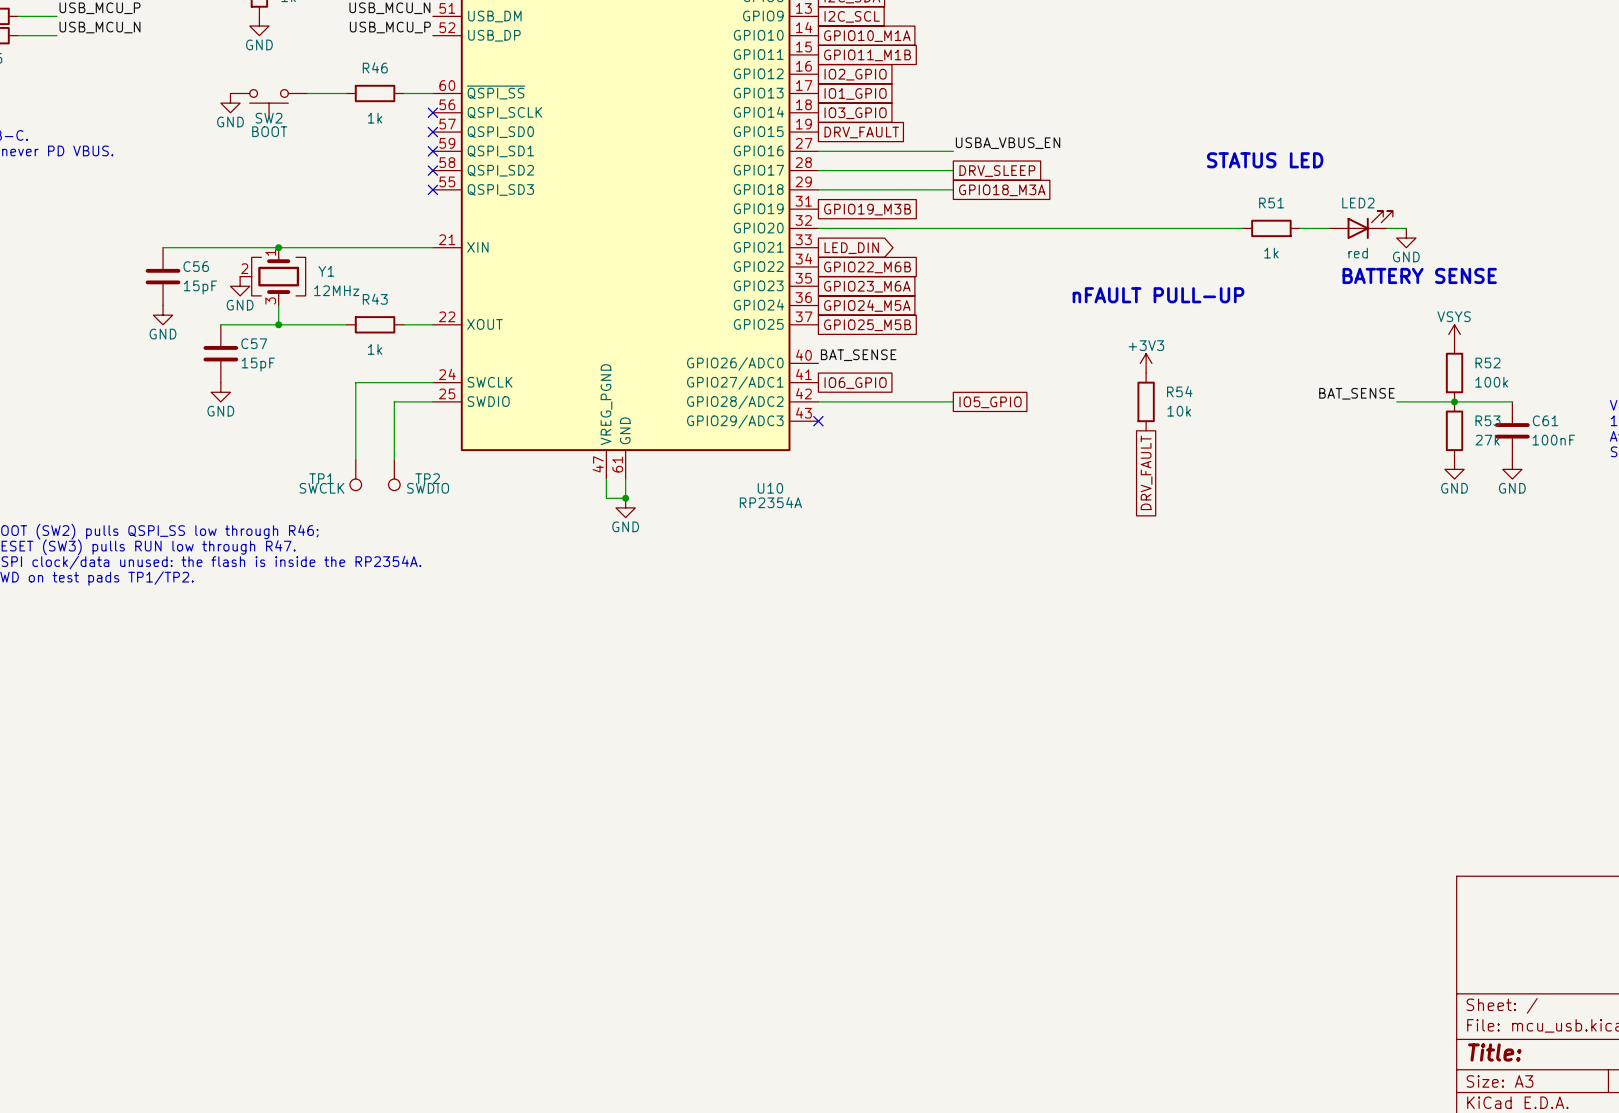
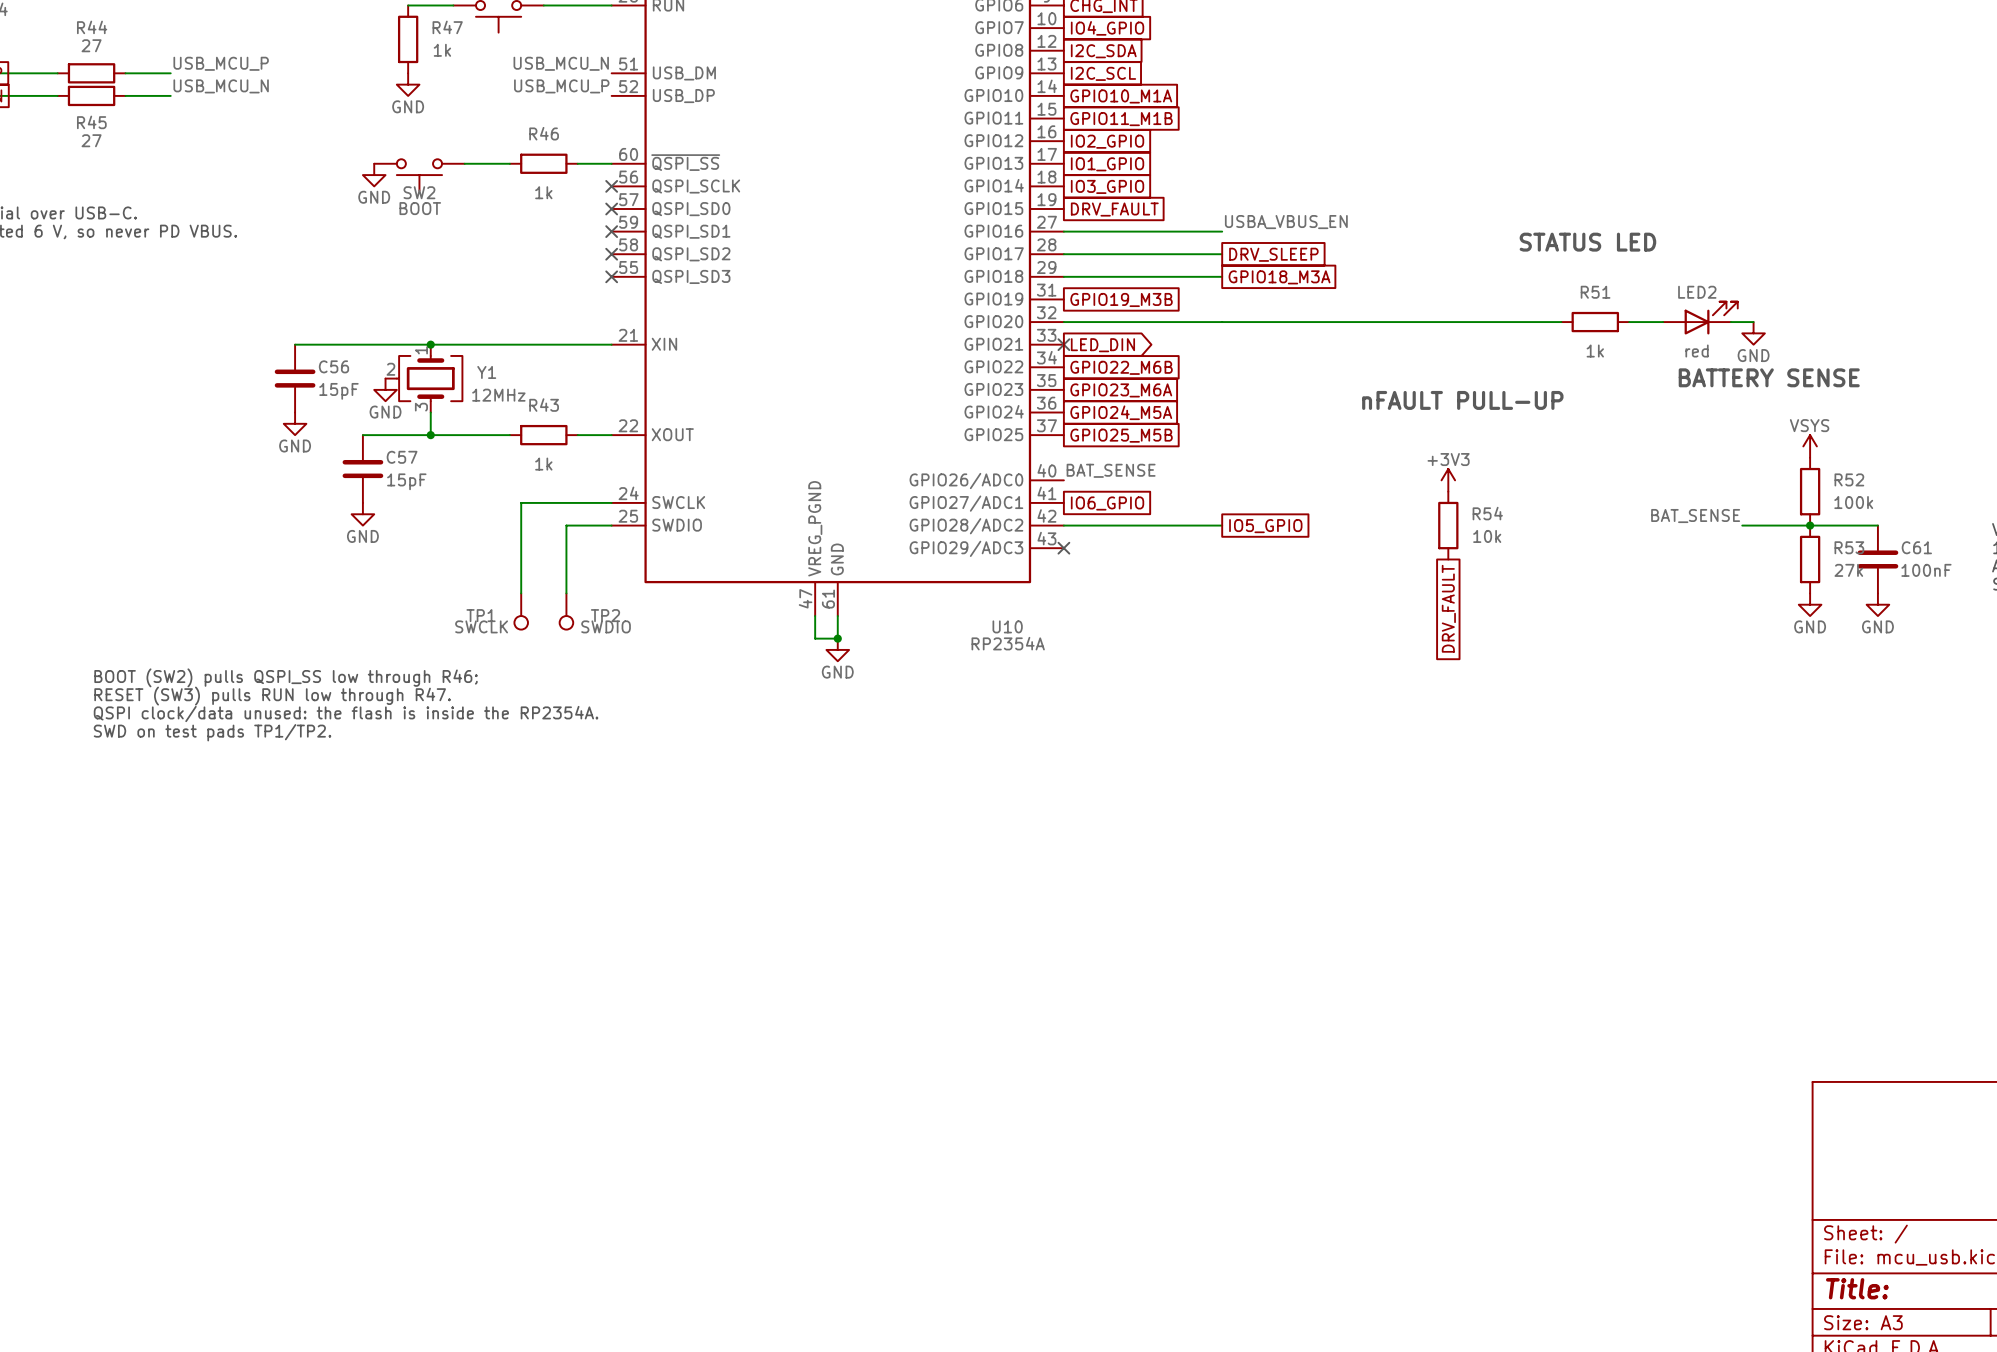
no-connect mark: none -> (1063, 344)

